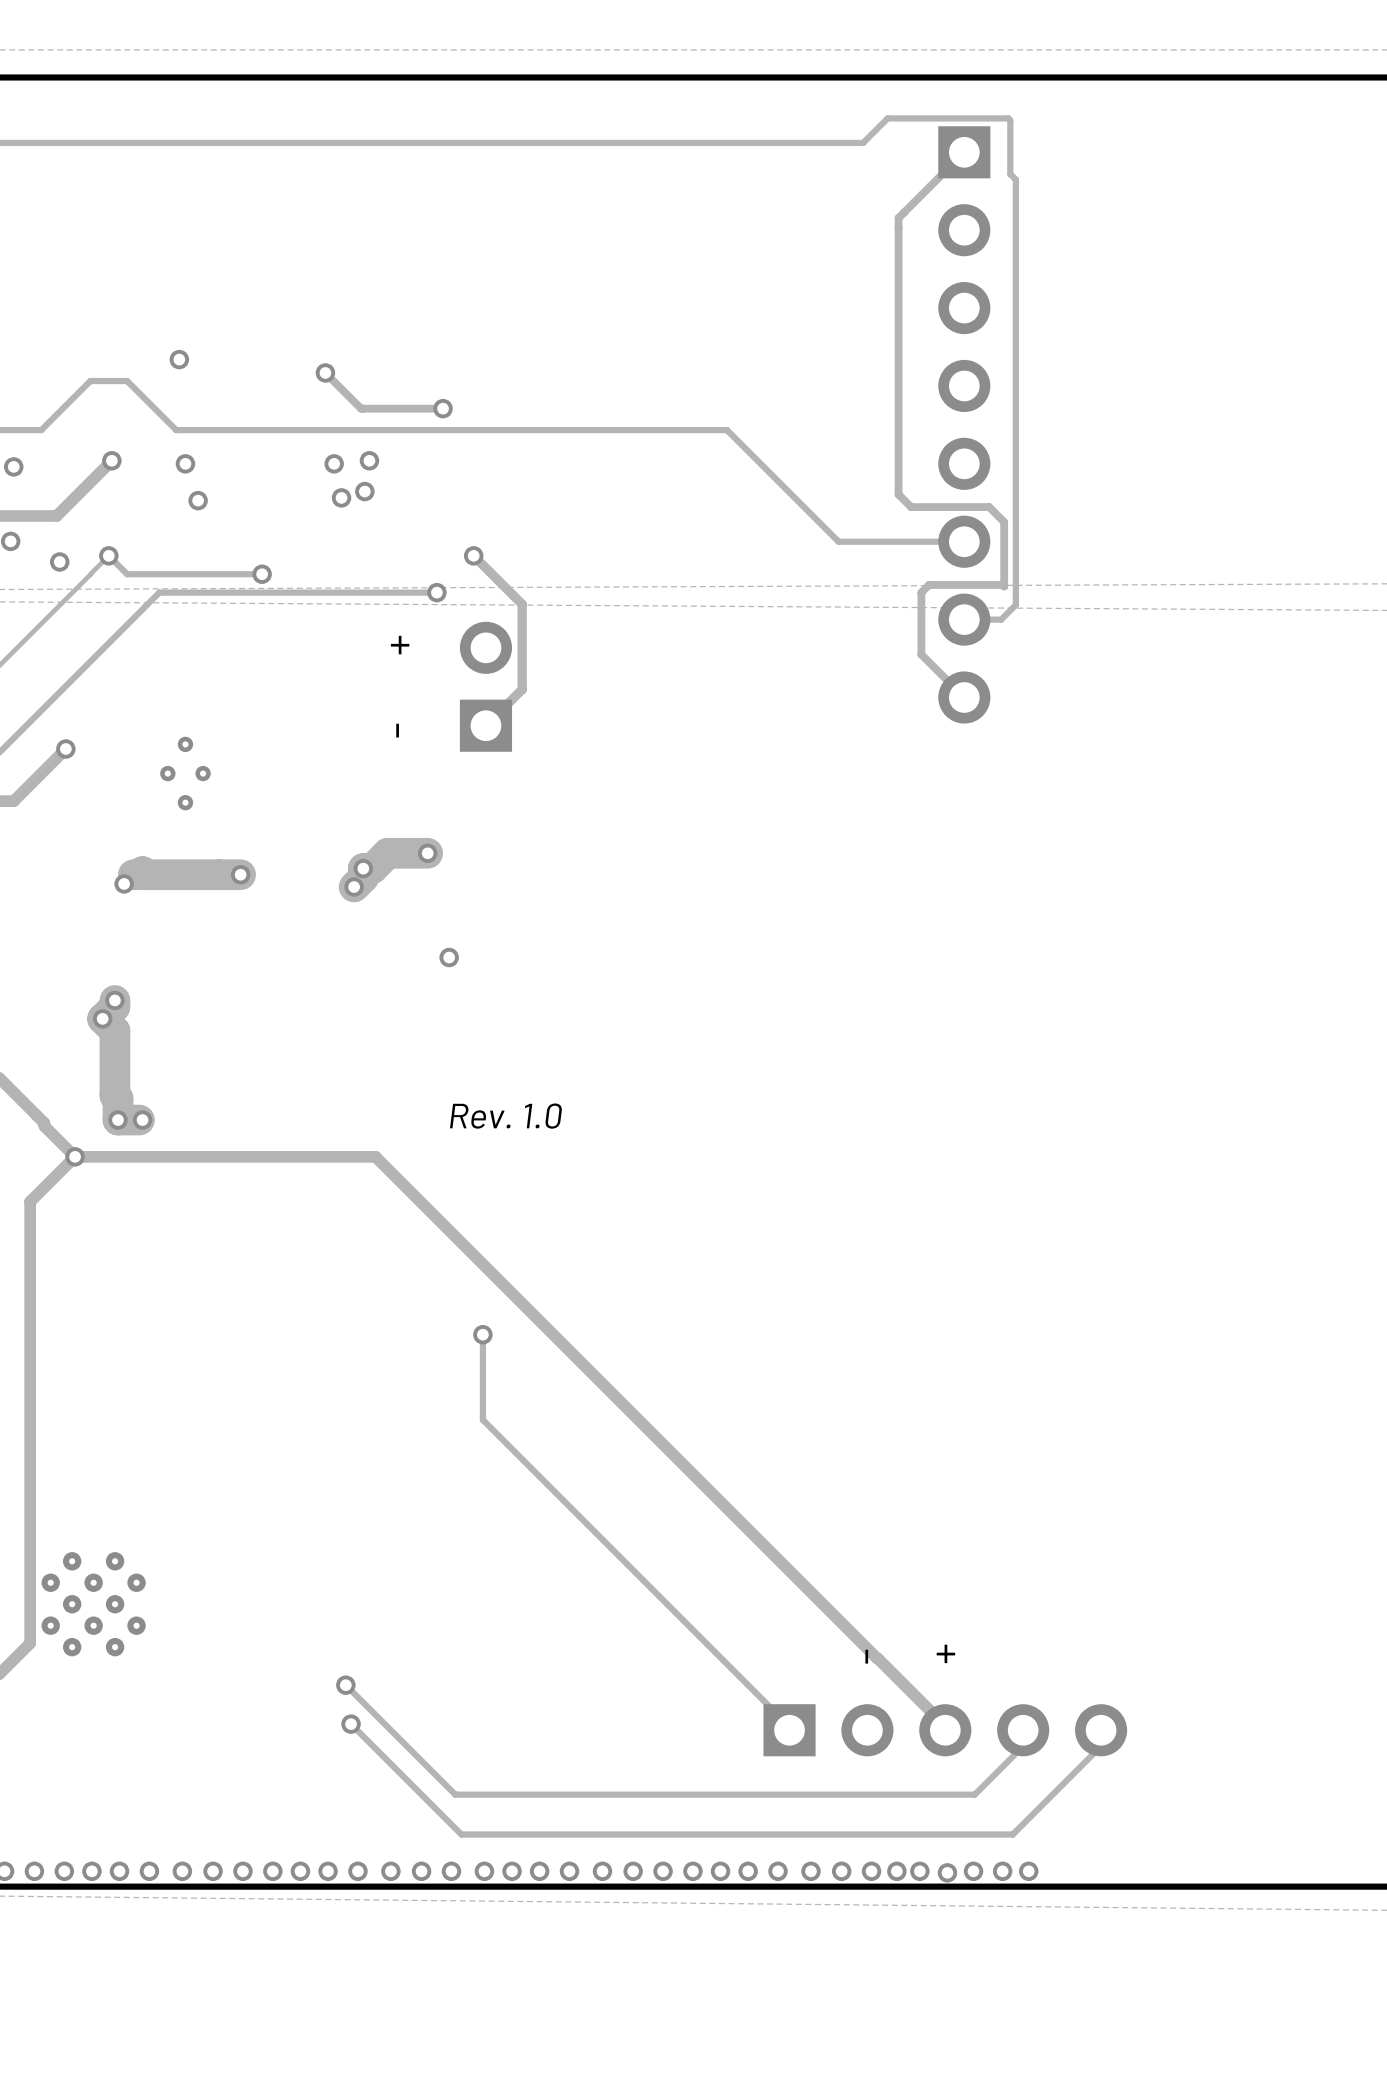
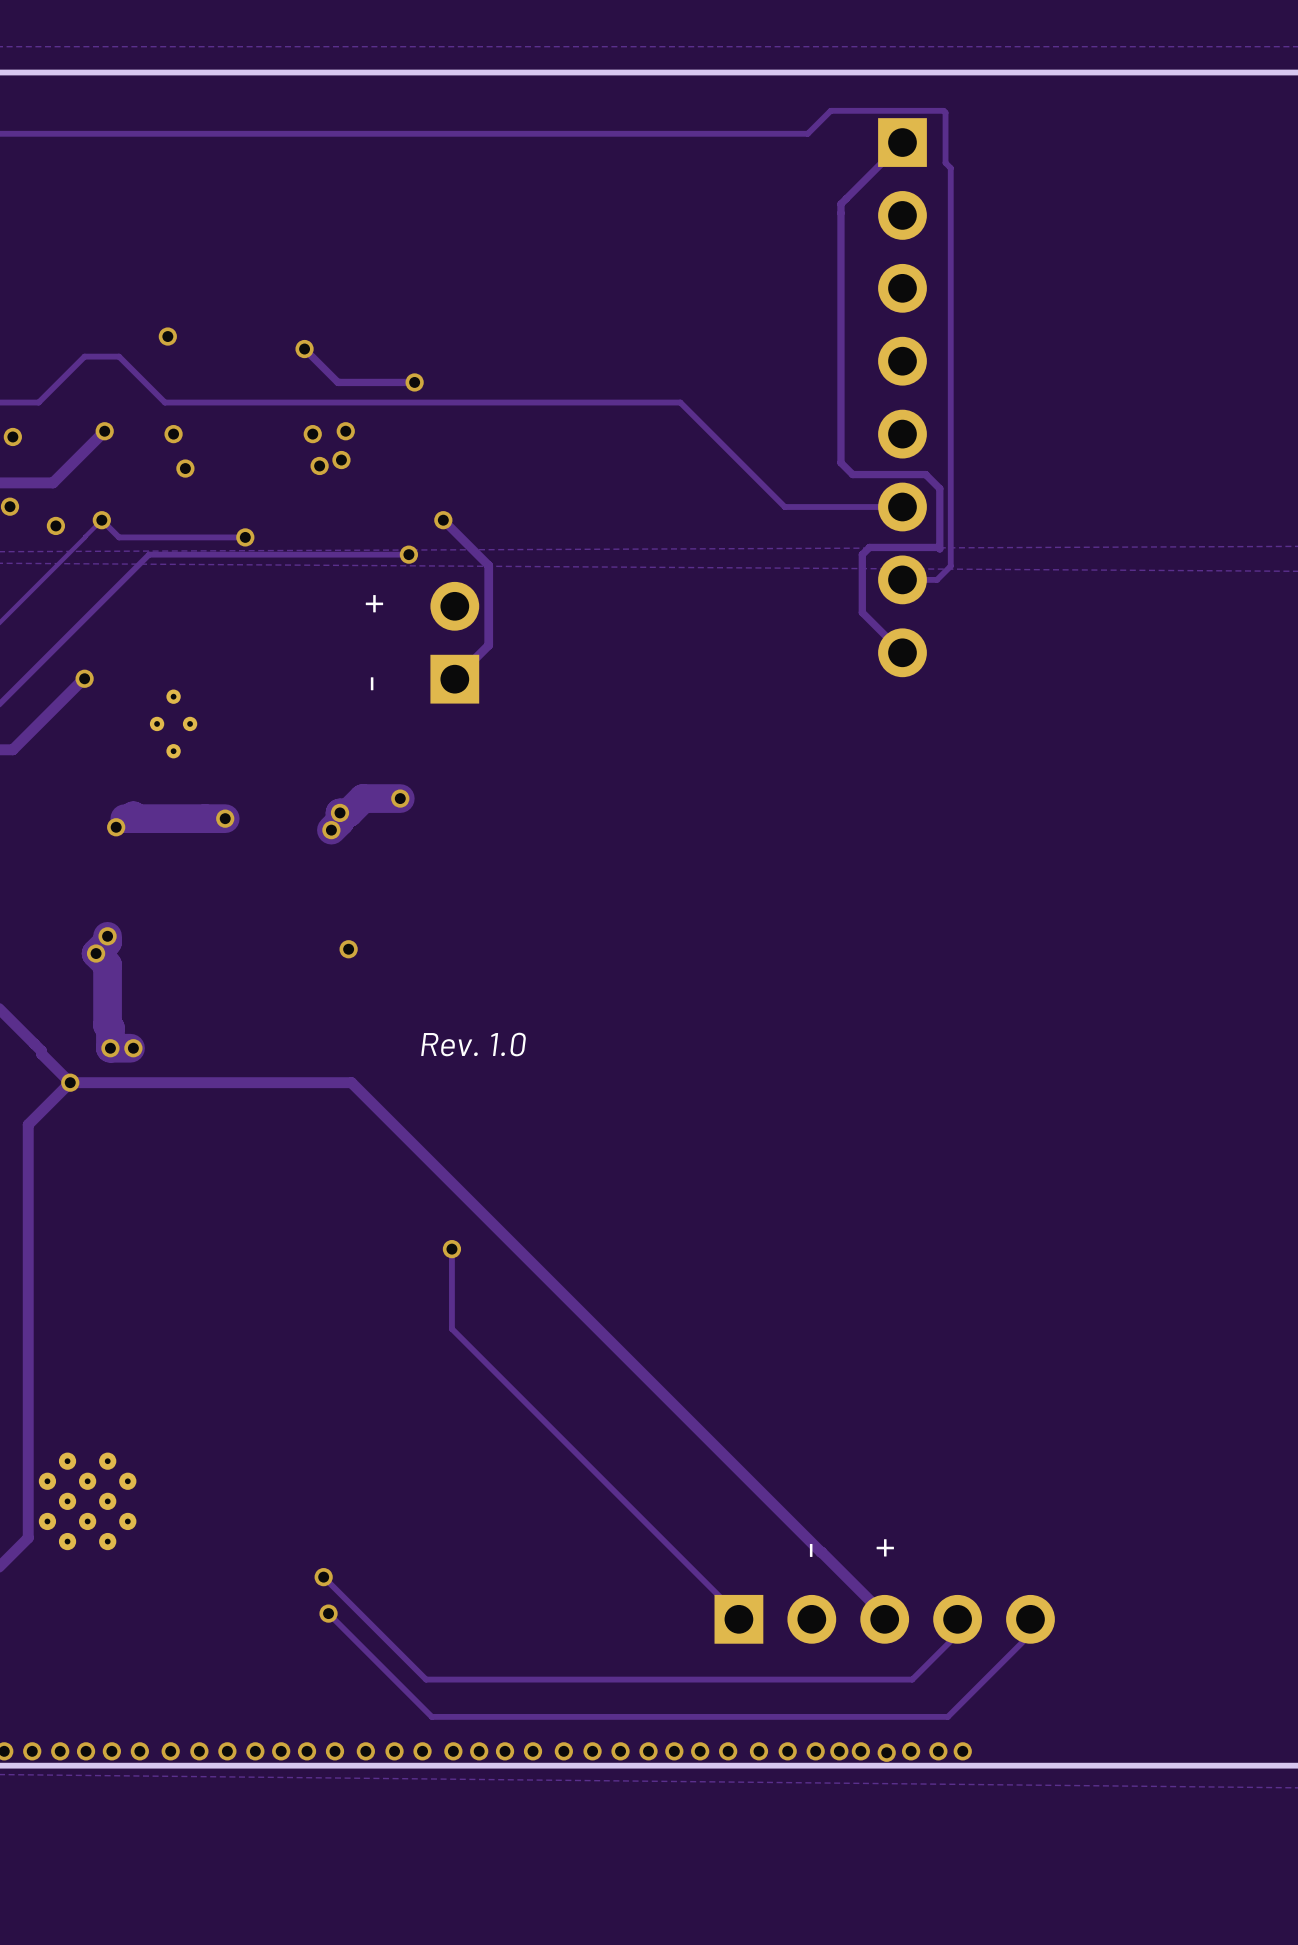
track: none -> (81, 680) (61, 700)
via position: (65, 749) -> (84, 678)
via position: (449, 957) -> (348, 949)

